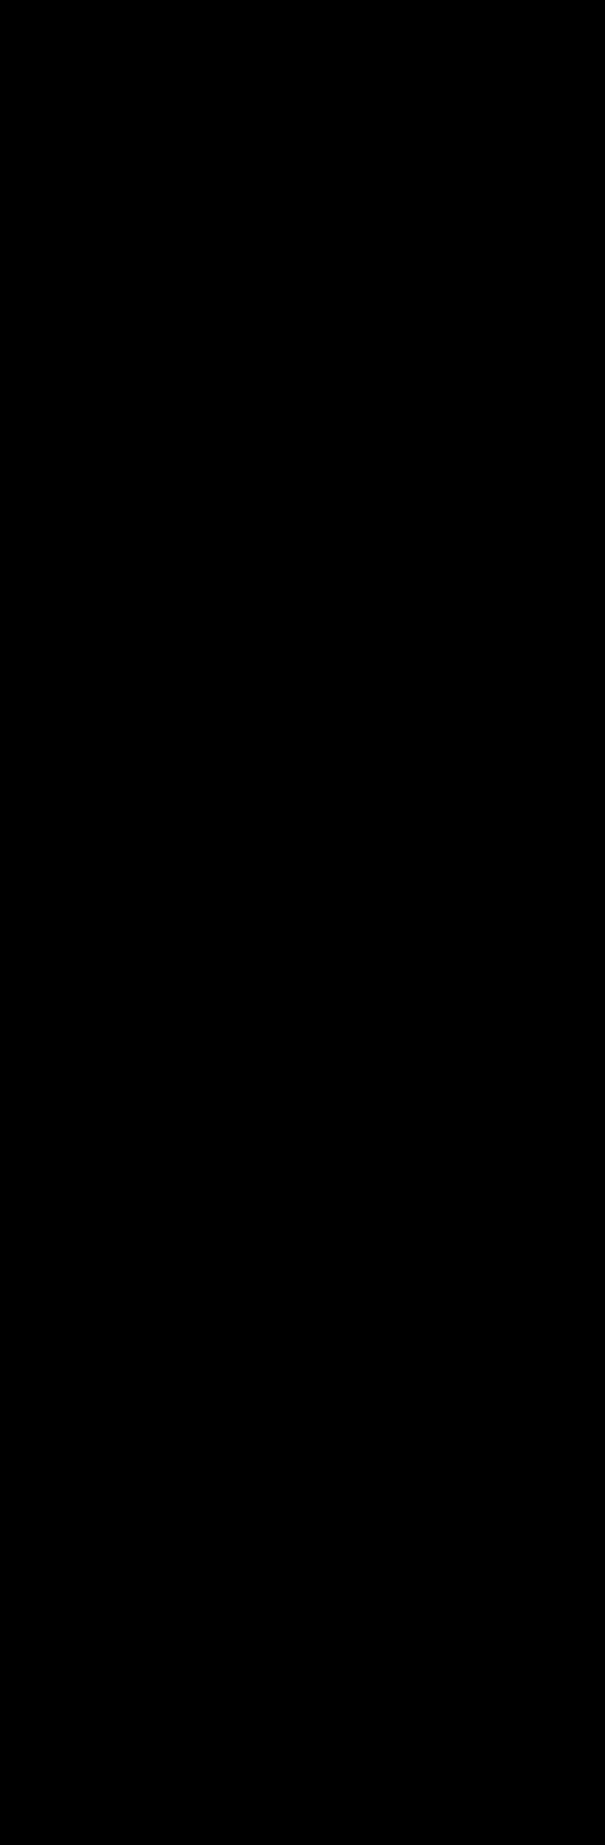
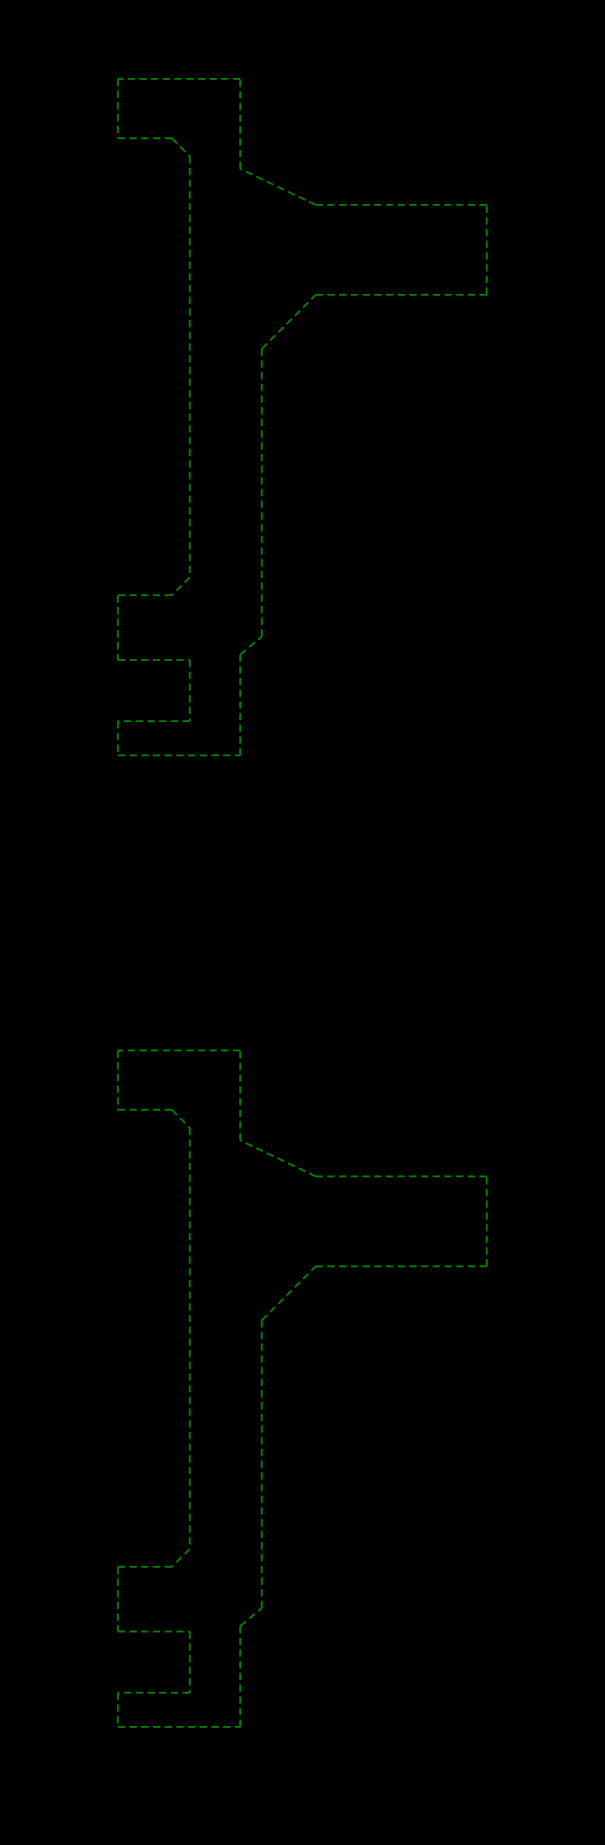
zone outline: none -> (240, 78) (240, 168) (315, 204) (486, 204) (486, 294) (315, 294) (261, 348) (261, 636) (240, 654) (240, 755) (117, 755) (117, 721) (189, 721) (189, 660) (117, 660) (117, 595) (171, 595) (189, 577) (189, 156) (171, 138) (117, 138) (117, 78) (240, 78)
zone outline: none -> (240, 1050) (240, 1140) (315, 1176) (486, 1176) (486, 1266) (315, 1266) (261, 1320) (261, 1608) (240, 1626) (240, 1726) (117, 1726) (117, 1692) (189, 1692) (189, 1631) (117, 1631) (117, 1566) (171, 1566) (189, 1548) (189, 1127) (171, 1109) (117, 1109) (117, 1050) (240, 1050)

